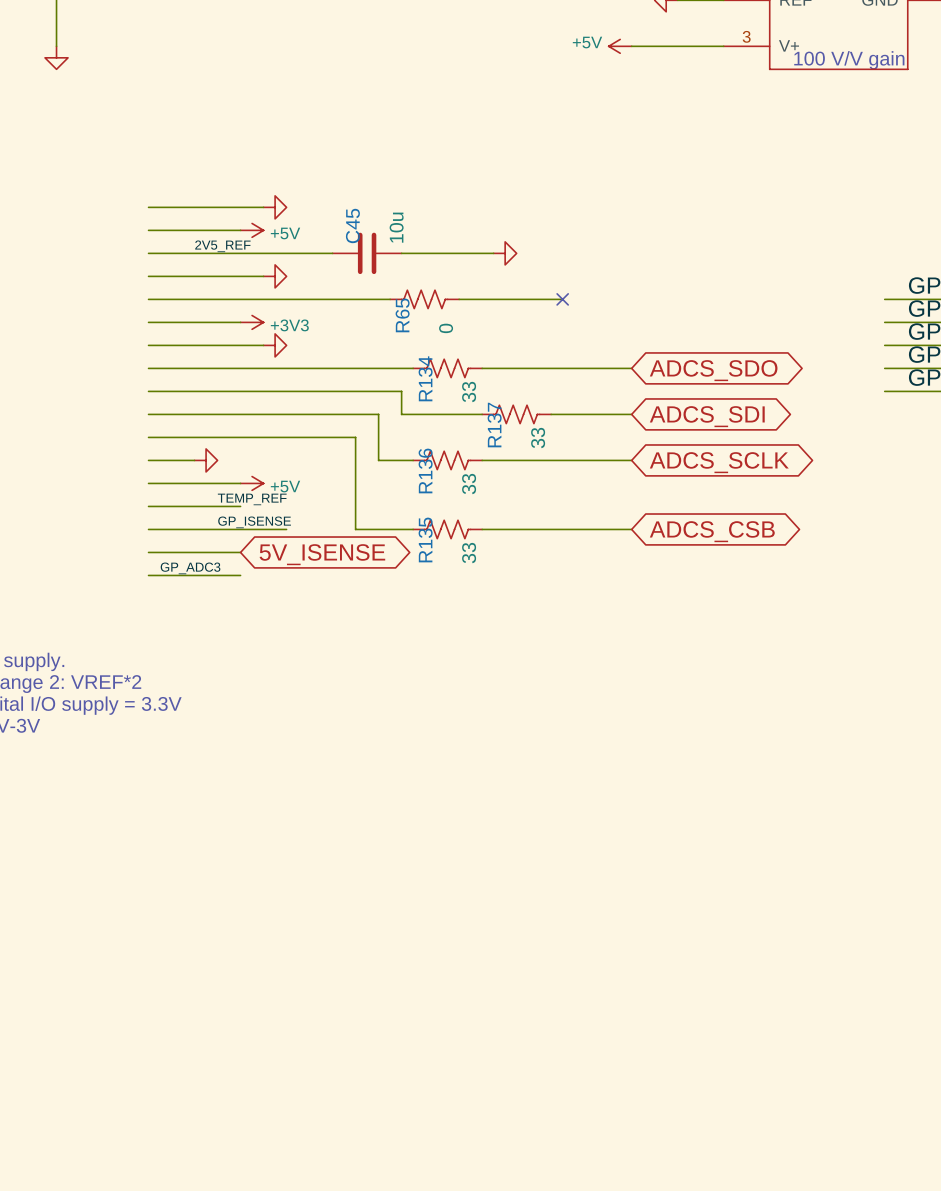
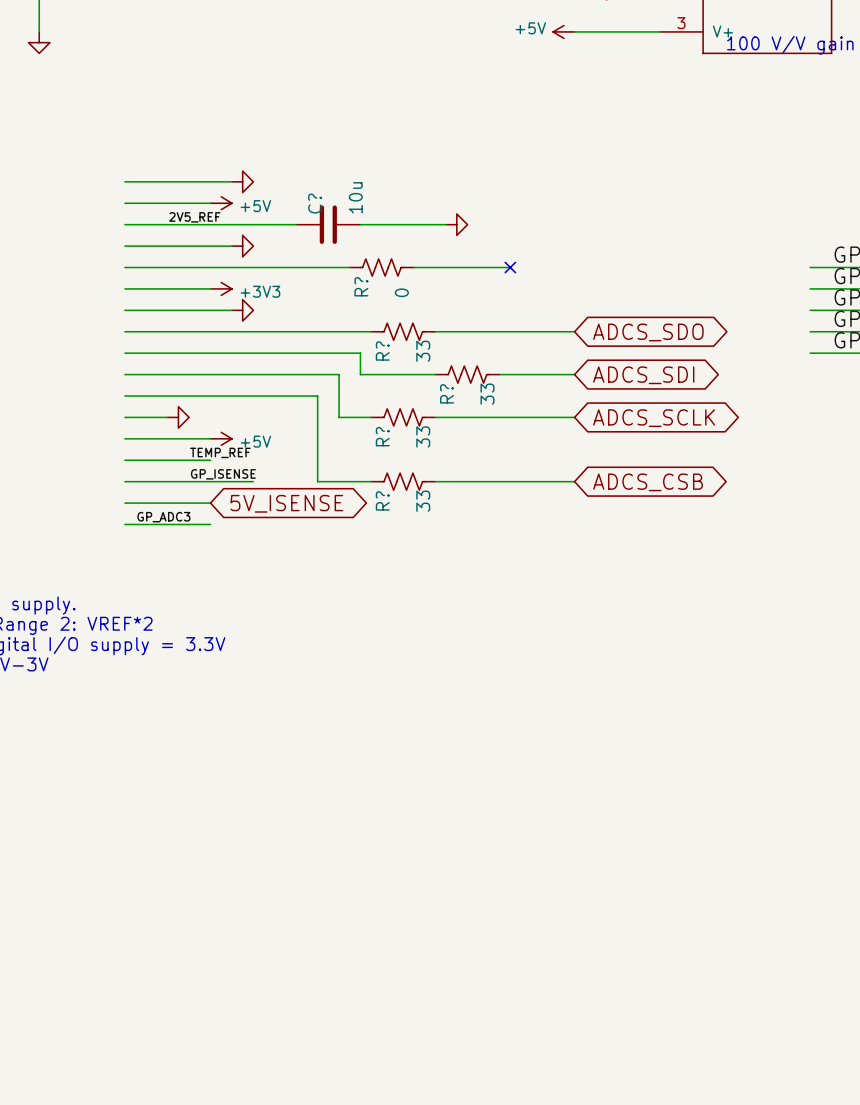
C45 name: C45 (352, 225) -> C? (315, 203)
R65 name: R65 (402, 315) -> R? (361, 286)
R134 name: R134 (425, 378) -> R? (382, 351)
R137 name: R137 (494, 425) -> R? (447, 393)
R136 name: R136 (425, 470) -> R? (382, 436)
R135 name: R135 (425, 539) -> R? (382, 500)

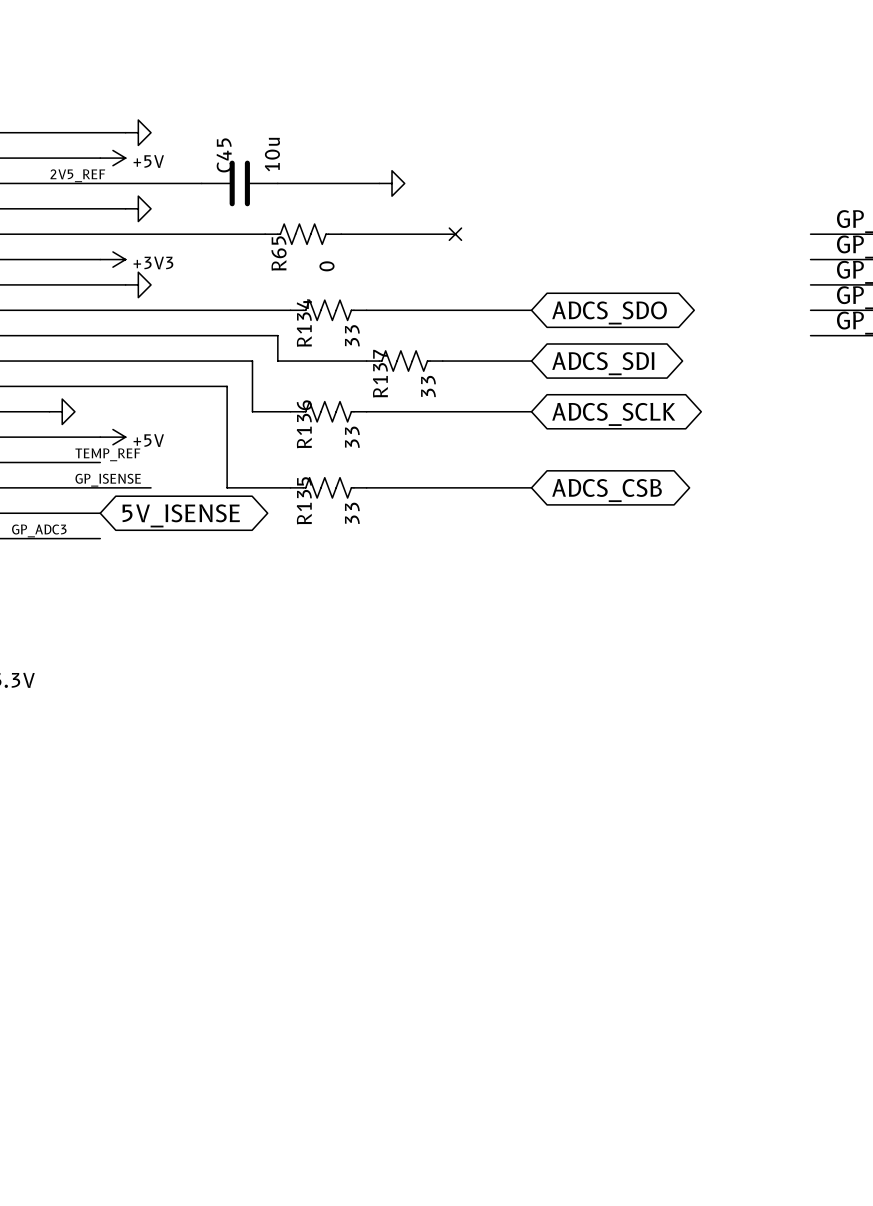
C? name: C? (315, 203) -> C45 (224, 155)
R? name: R? (361, 286) -> R65 (279, 253)
R? name: R? (382, 351) -> R134 (304, 322)
R? name: R? (447, 393) -> R137 (380, 373)
R? name: R? (382, 436) -> R136 (304, 424)
R? name: R? (382, 500) -> R135 (304, 500)

